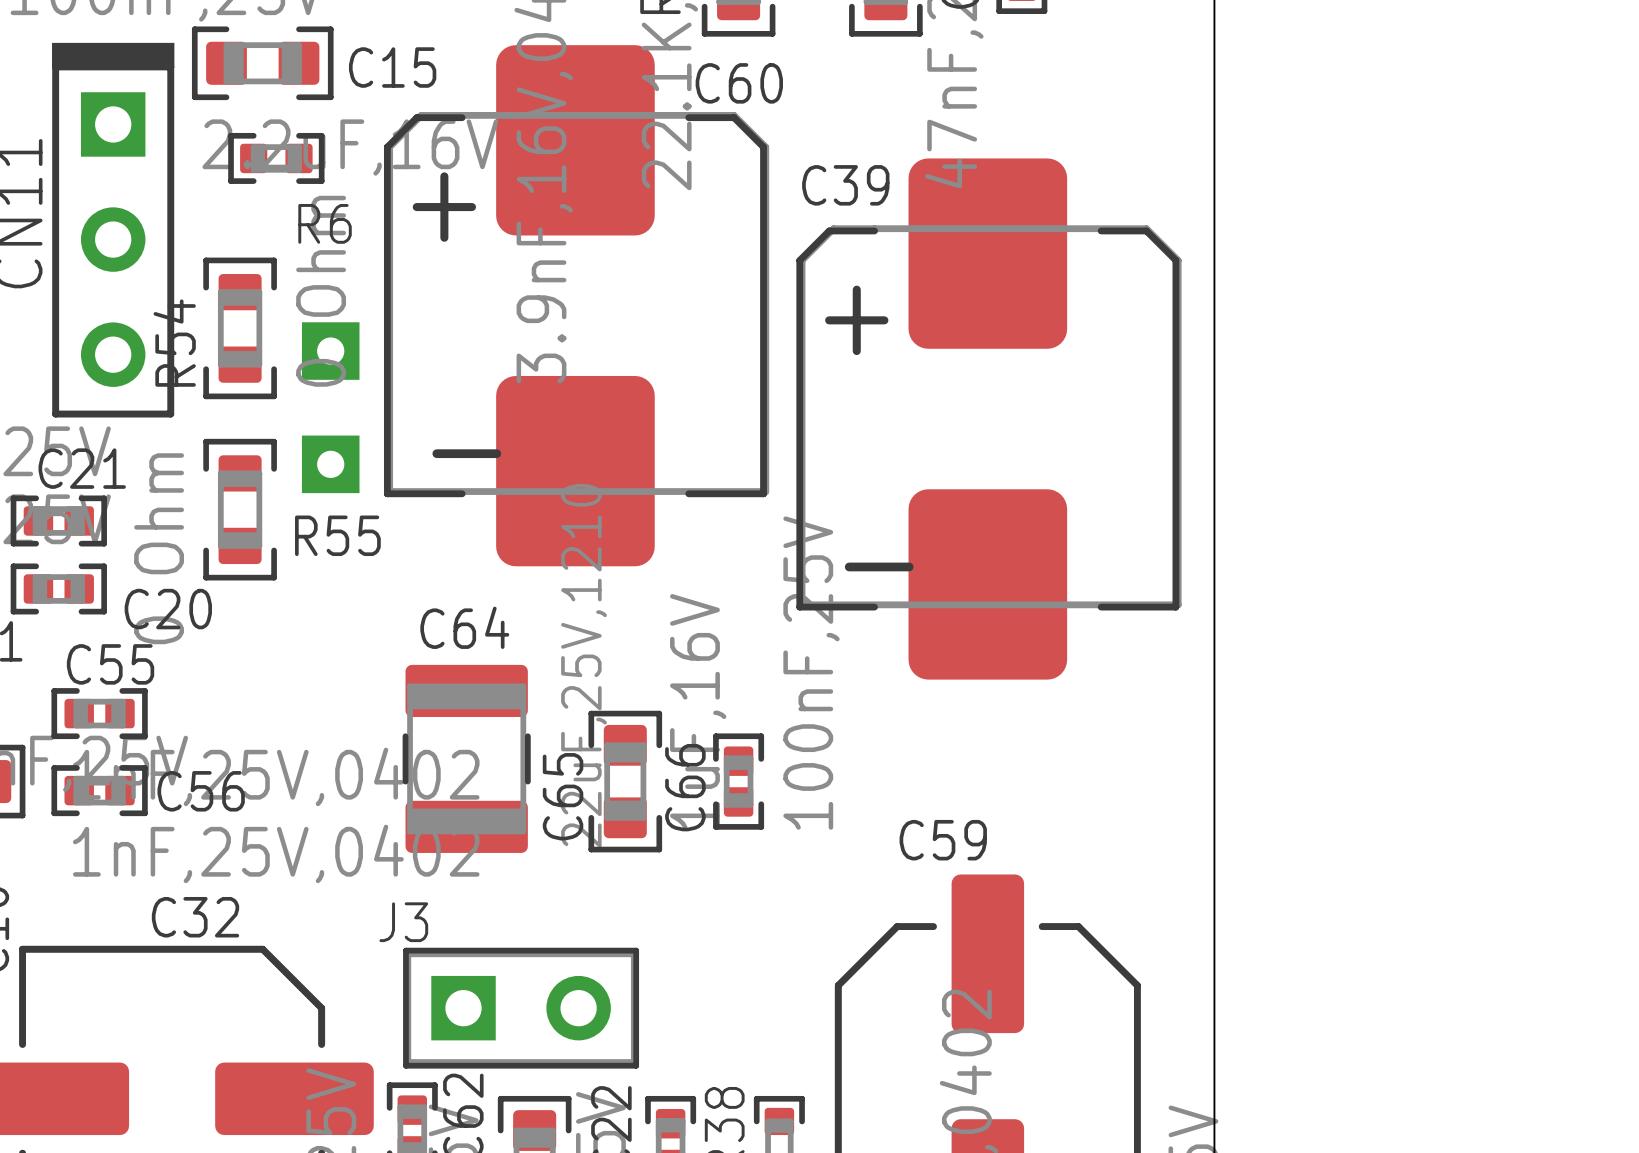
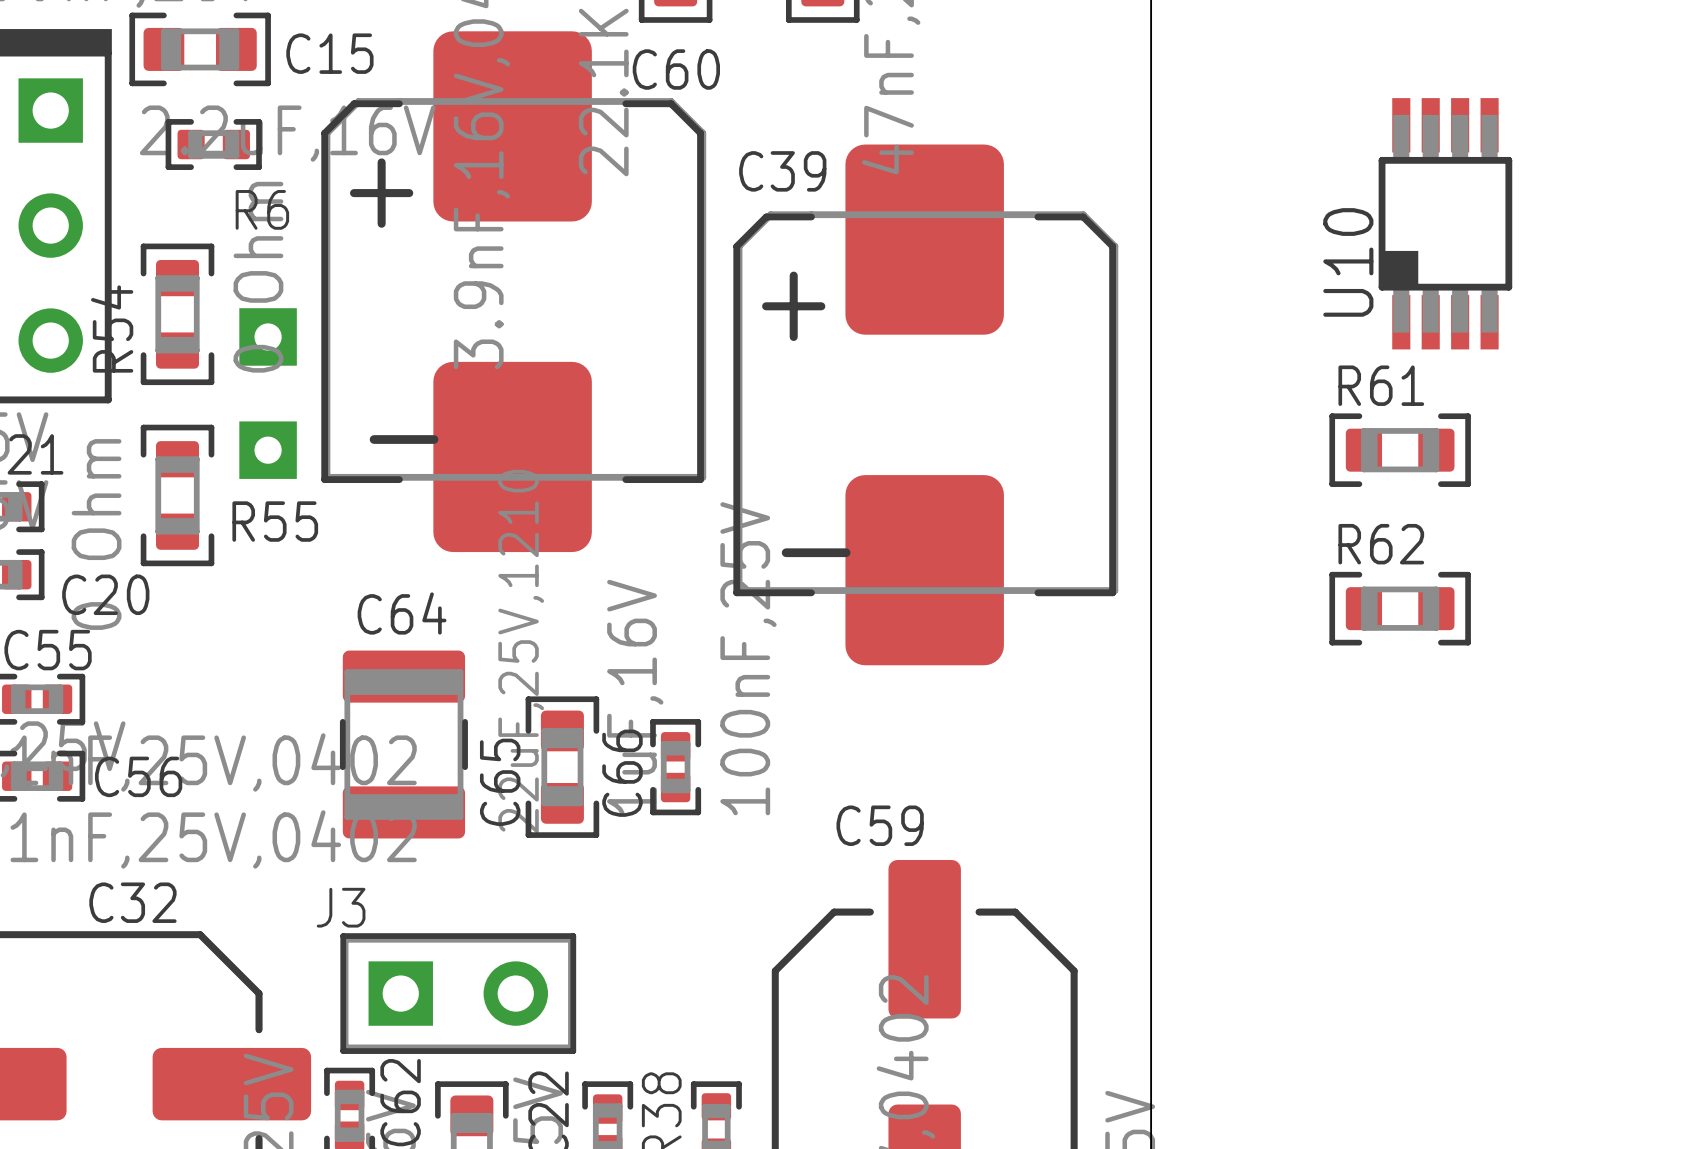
U10: none -> (1445, 223)
R61: none -> (1400, 450)
R62: none -> (1400, 608)

